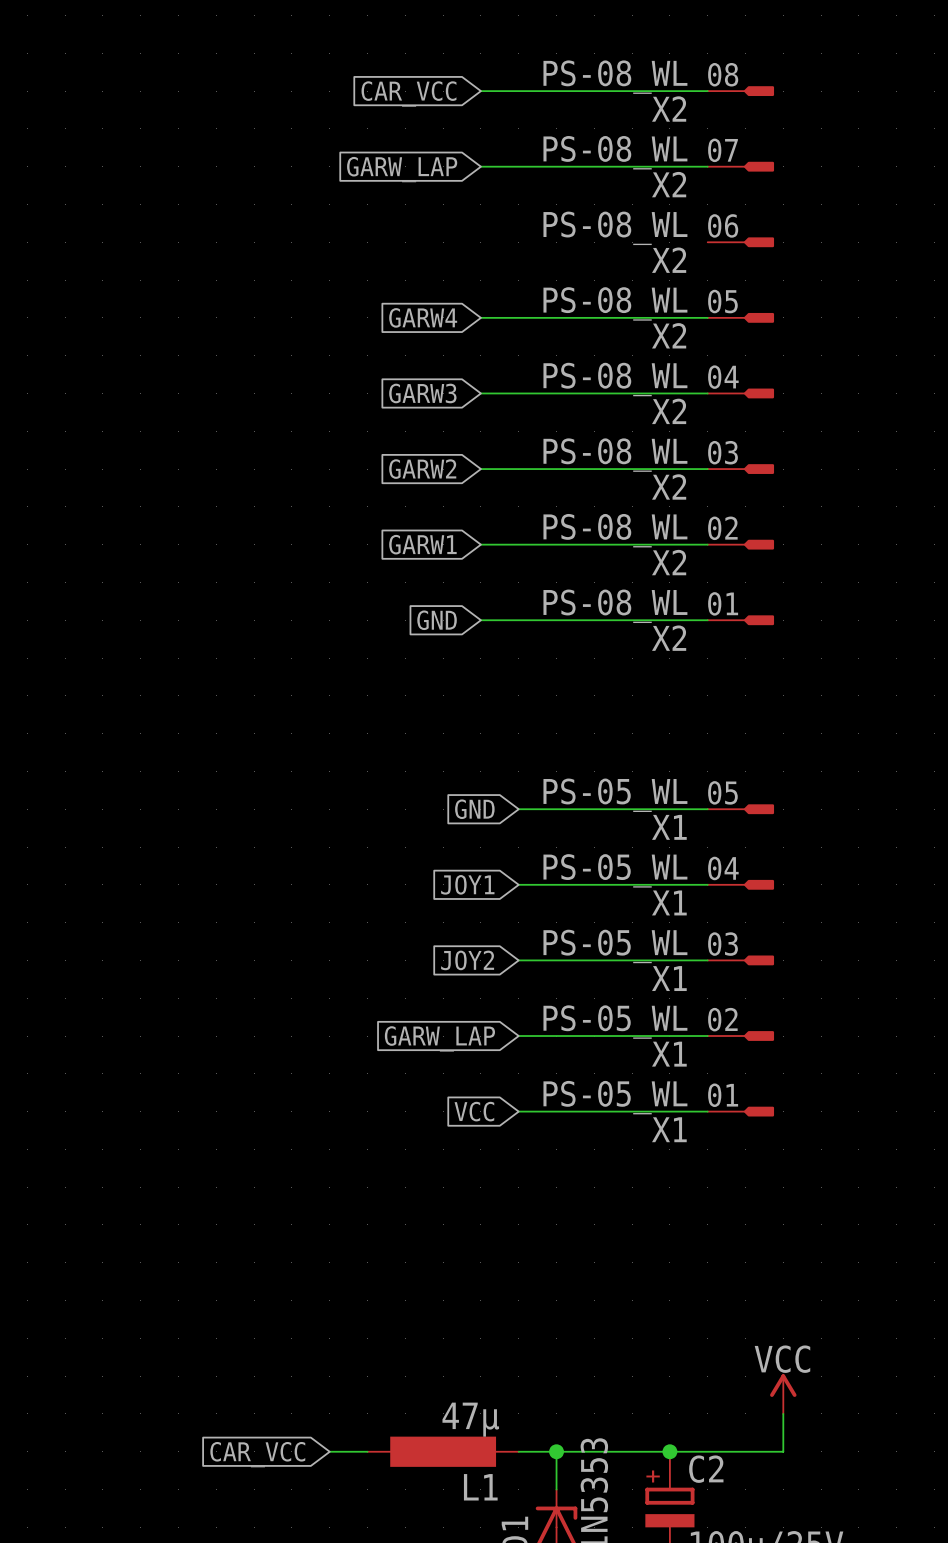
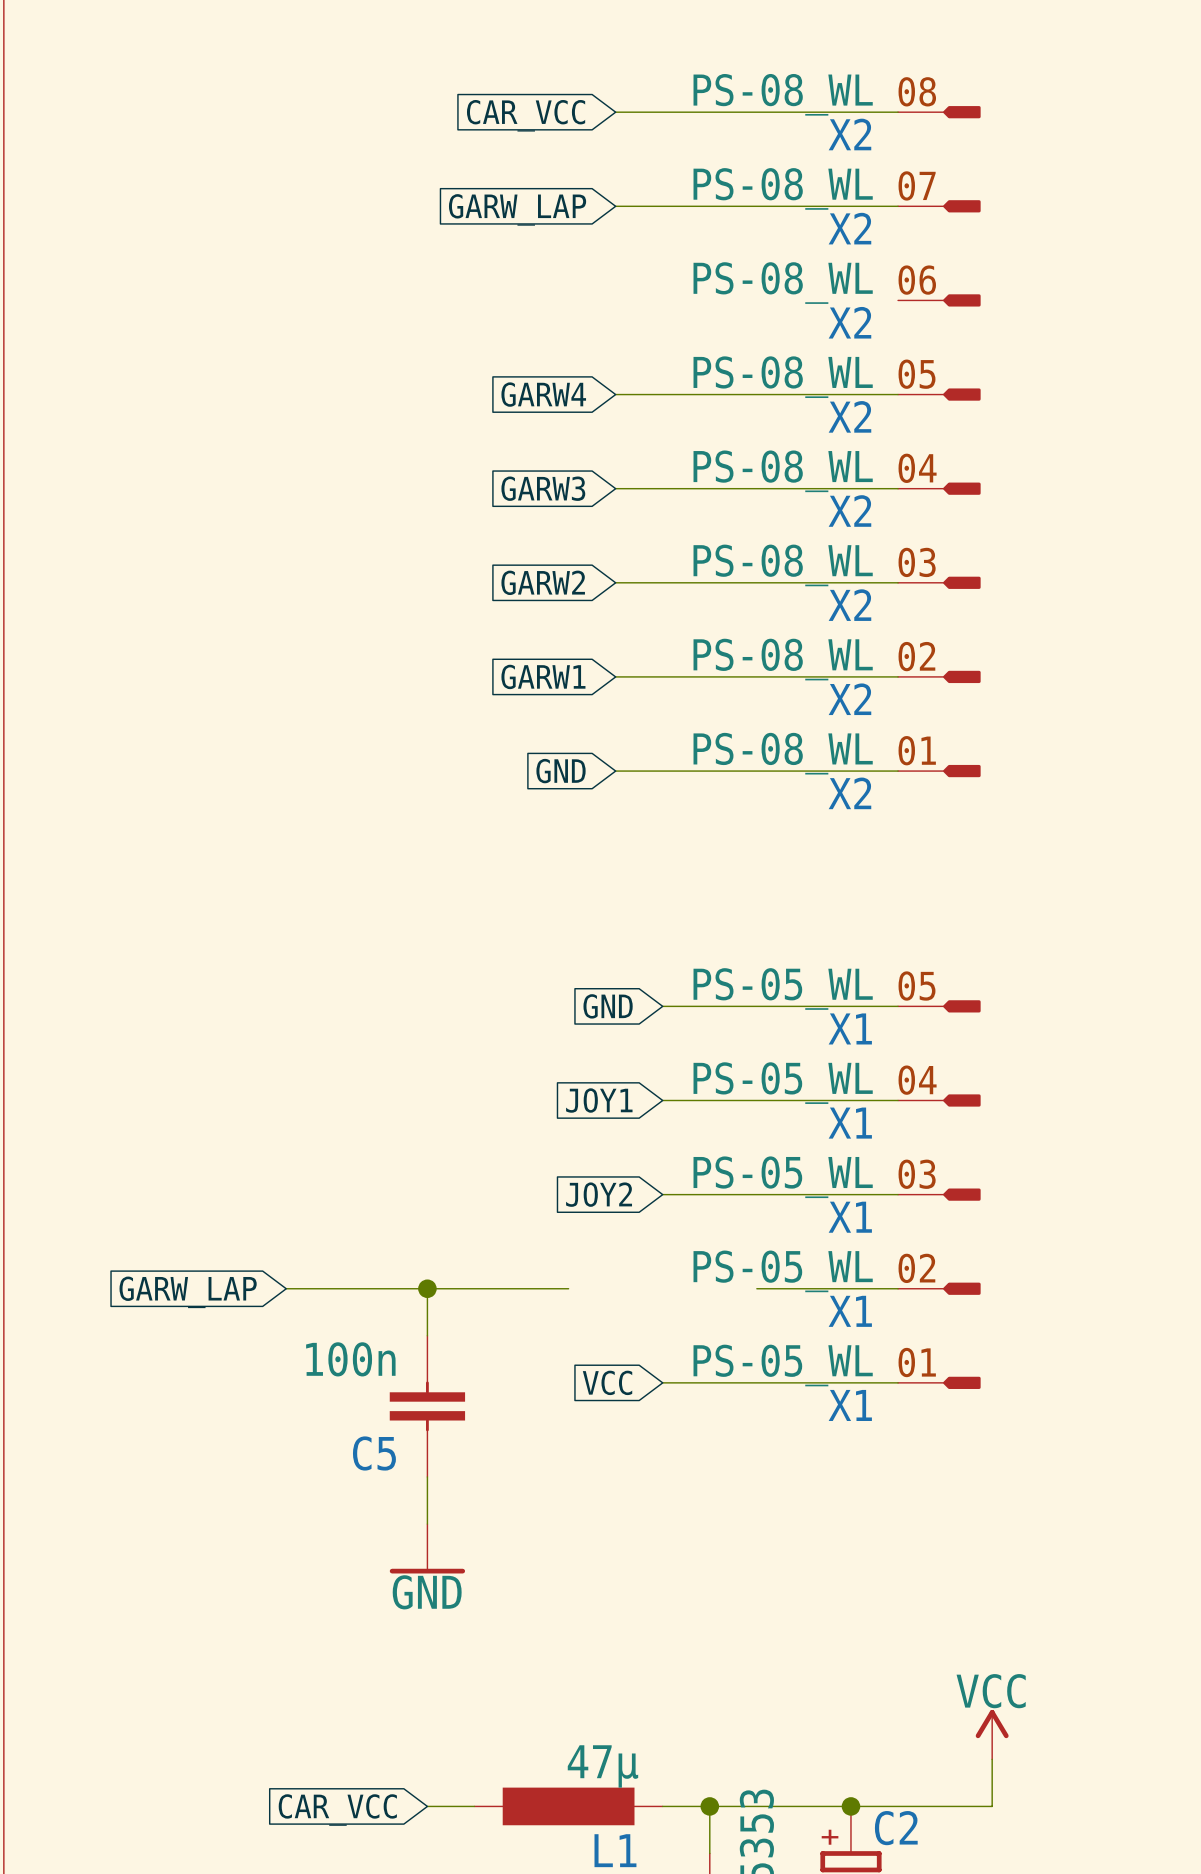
wire: none -> (286, 1288) (568, 1288)
wire: none -> (427, 1288) (427, 1335)
junction: none -> (427, 1288)
wire: (518, 1036) (594, 1036) -> none
global label position: GARW_LAP (439, 1038) -> GARW_LAP (188, 1292)
C5: none -> 100n (427, 1406)
wire: none -> (427, 1476) (427, 1524)
power symbol: none -> GND (427, 1548)

